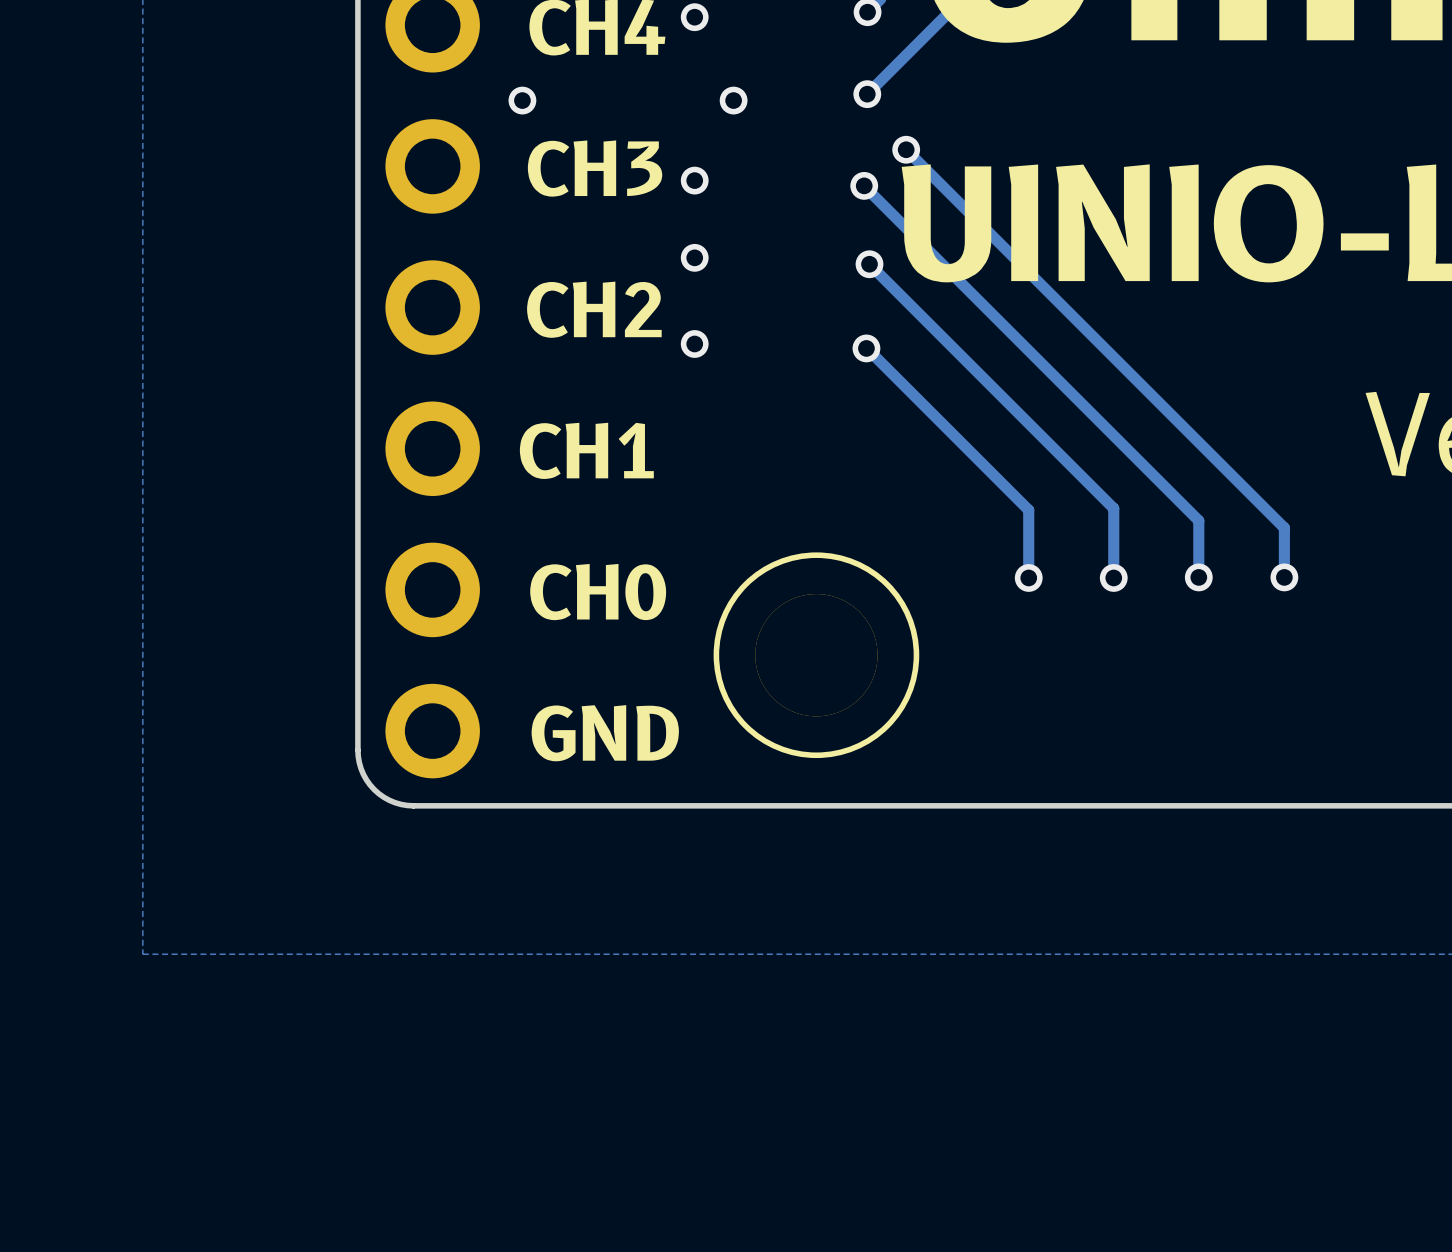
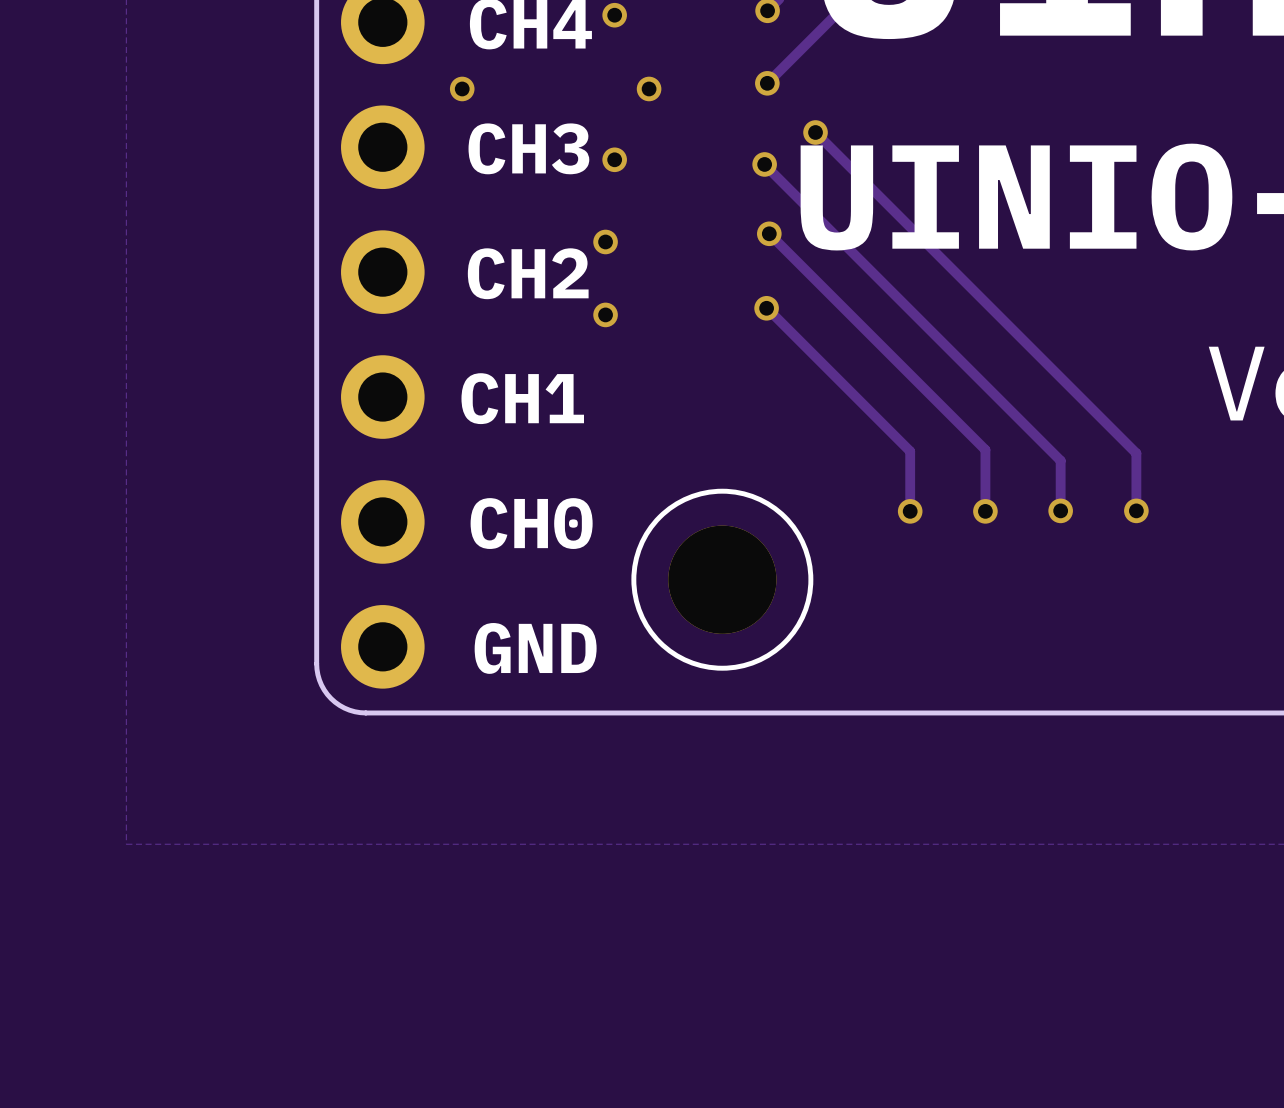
track: (906, 149) (1284, 527) -> (815, 132) (1136, 453) (1136, 467)
via position: (906, 149) -> (815, 132)
via position: (694, 257) -> (605, 241)
via position: (694, 343) -> (605, 314)

